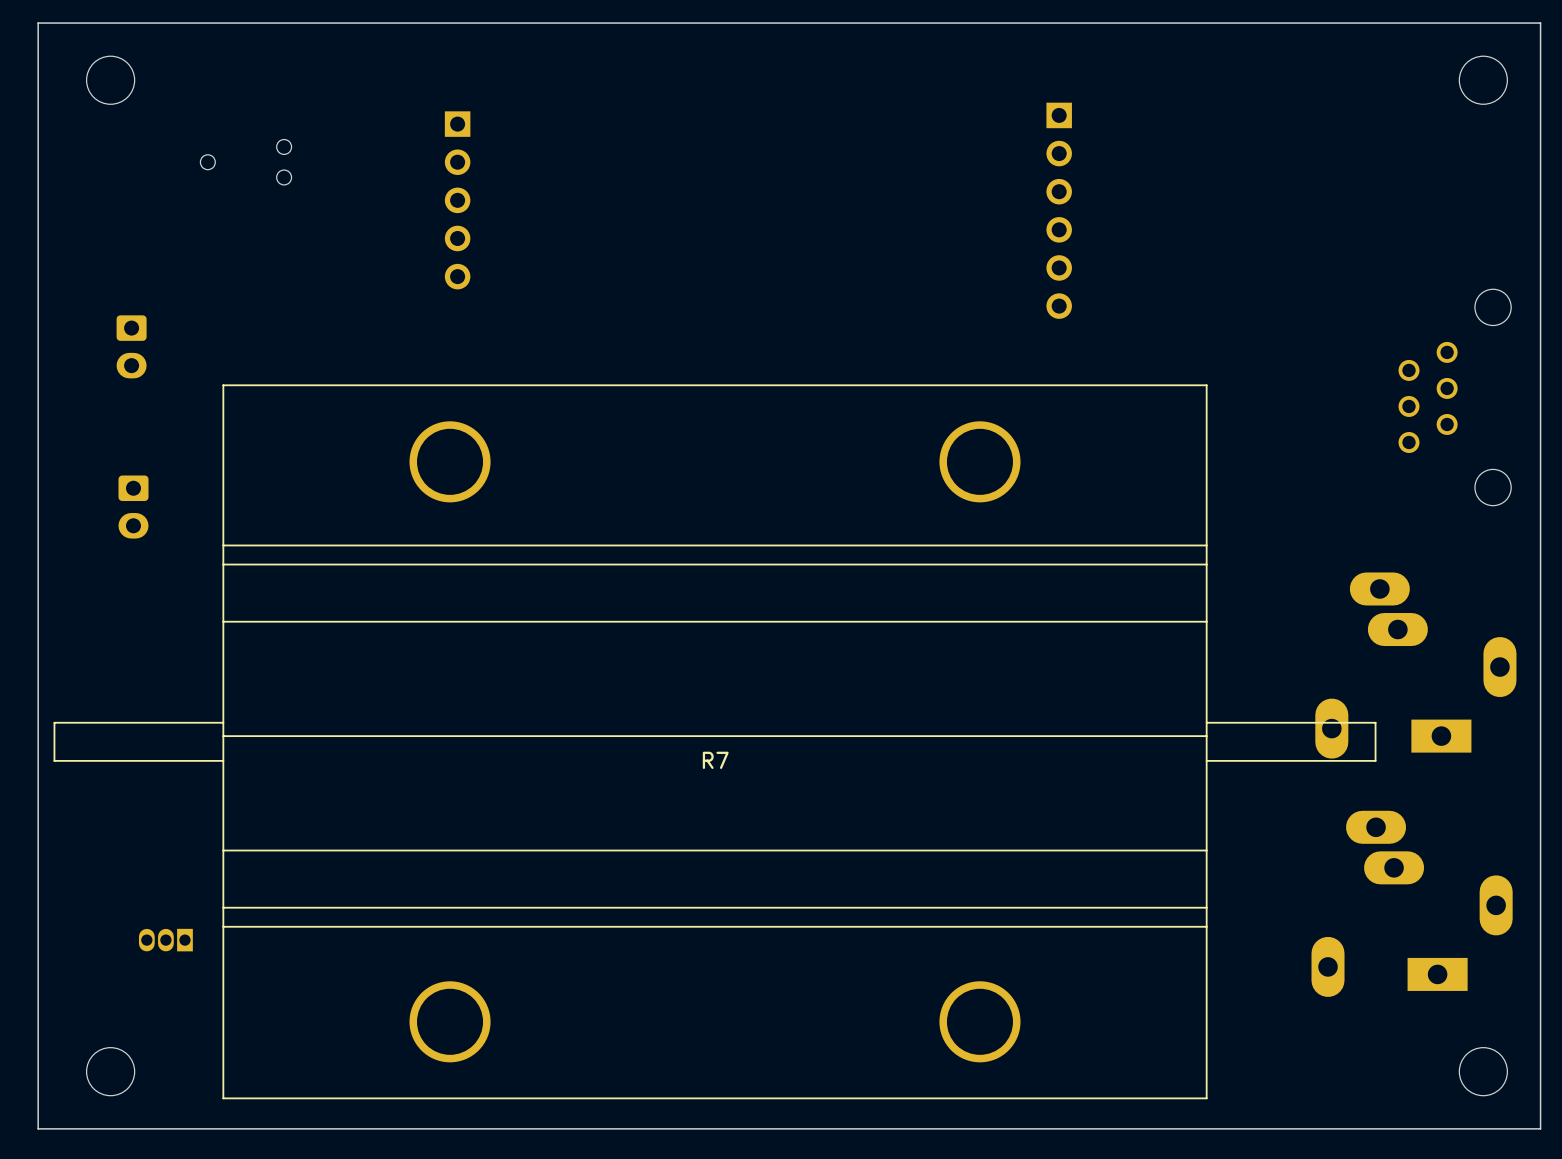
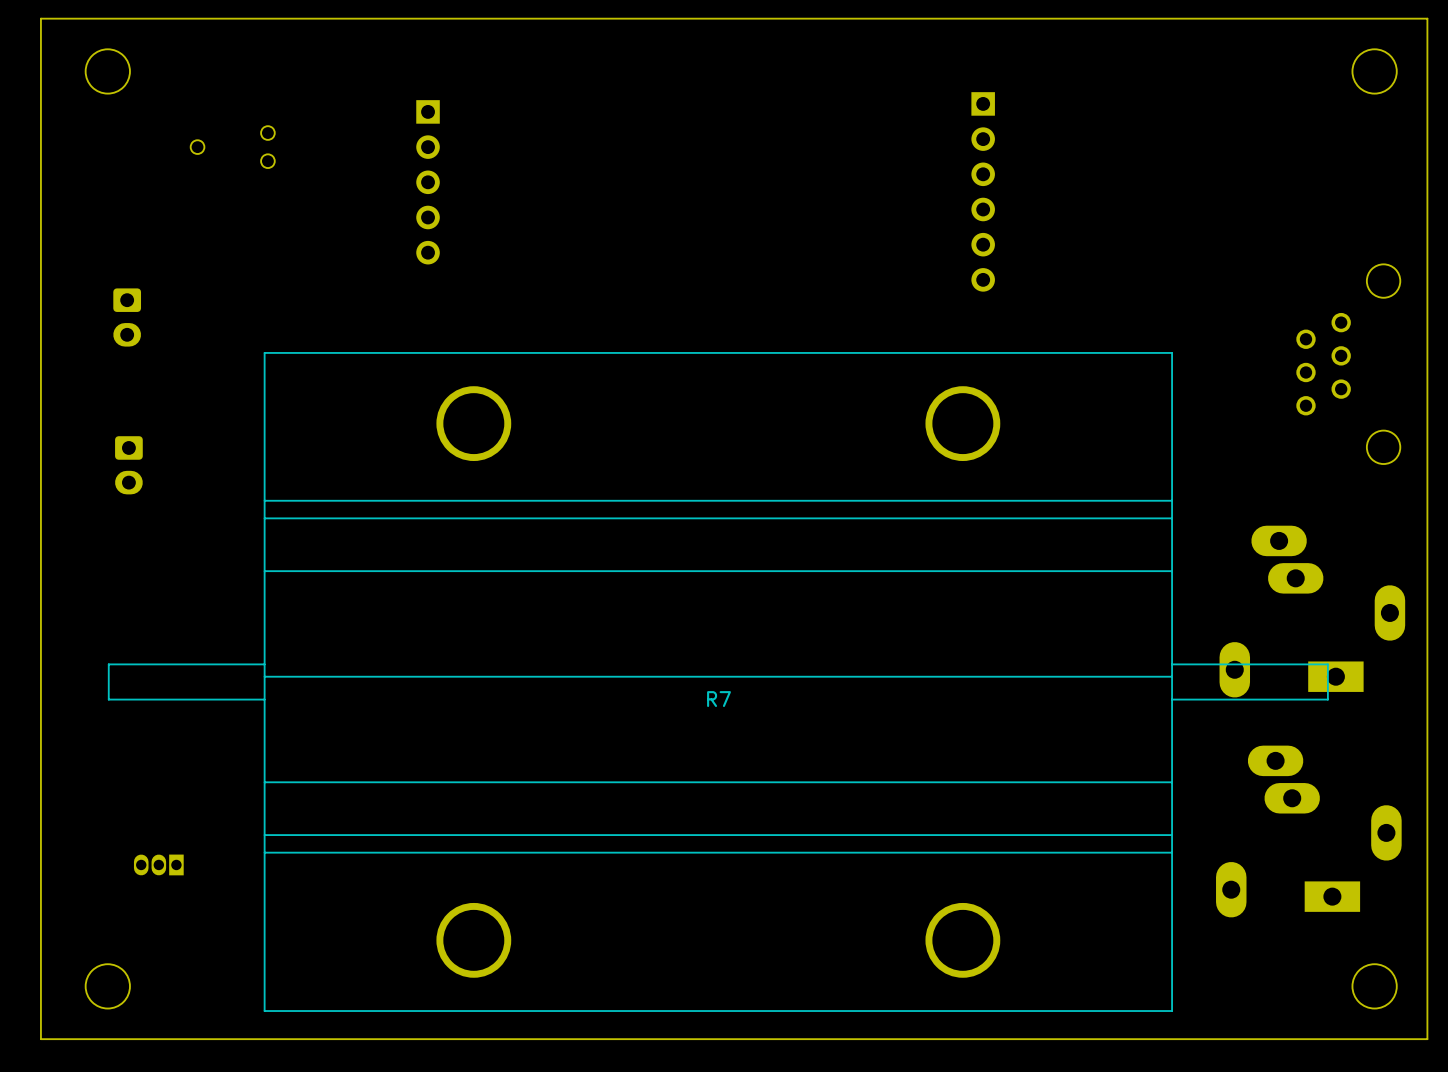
R7 position: (715, 741) -> (718, 681)

